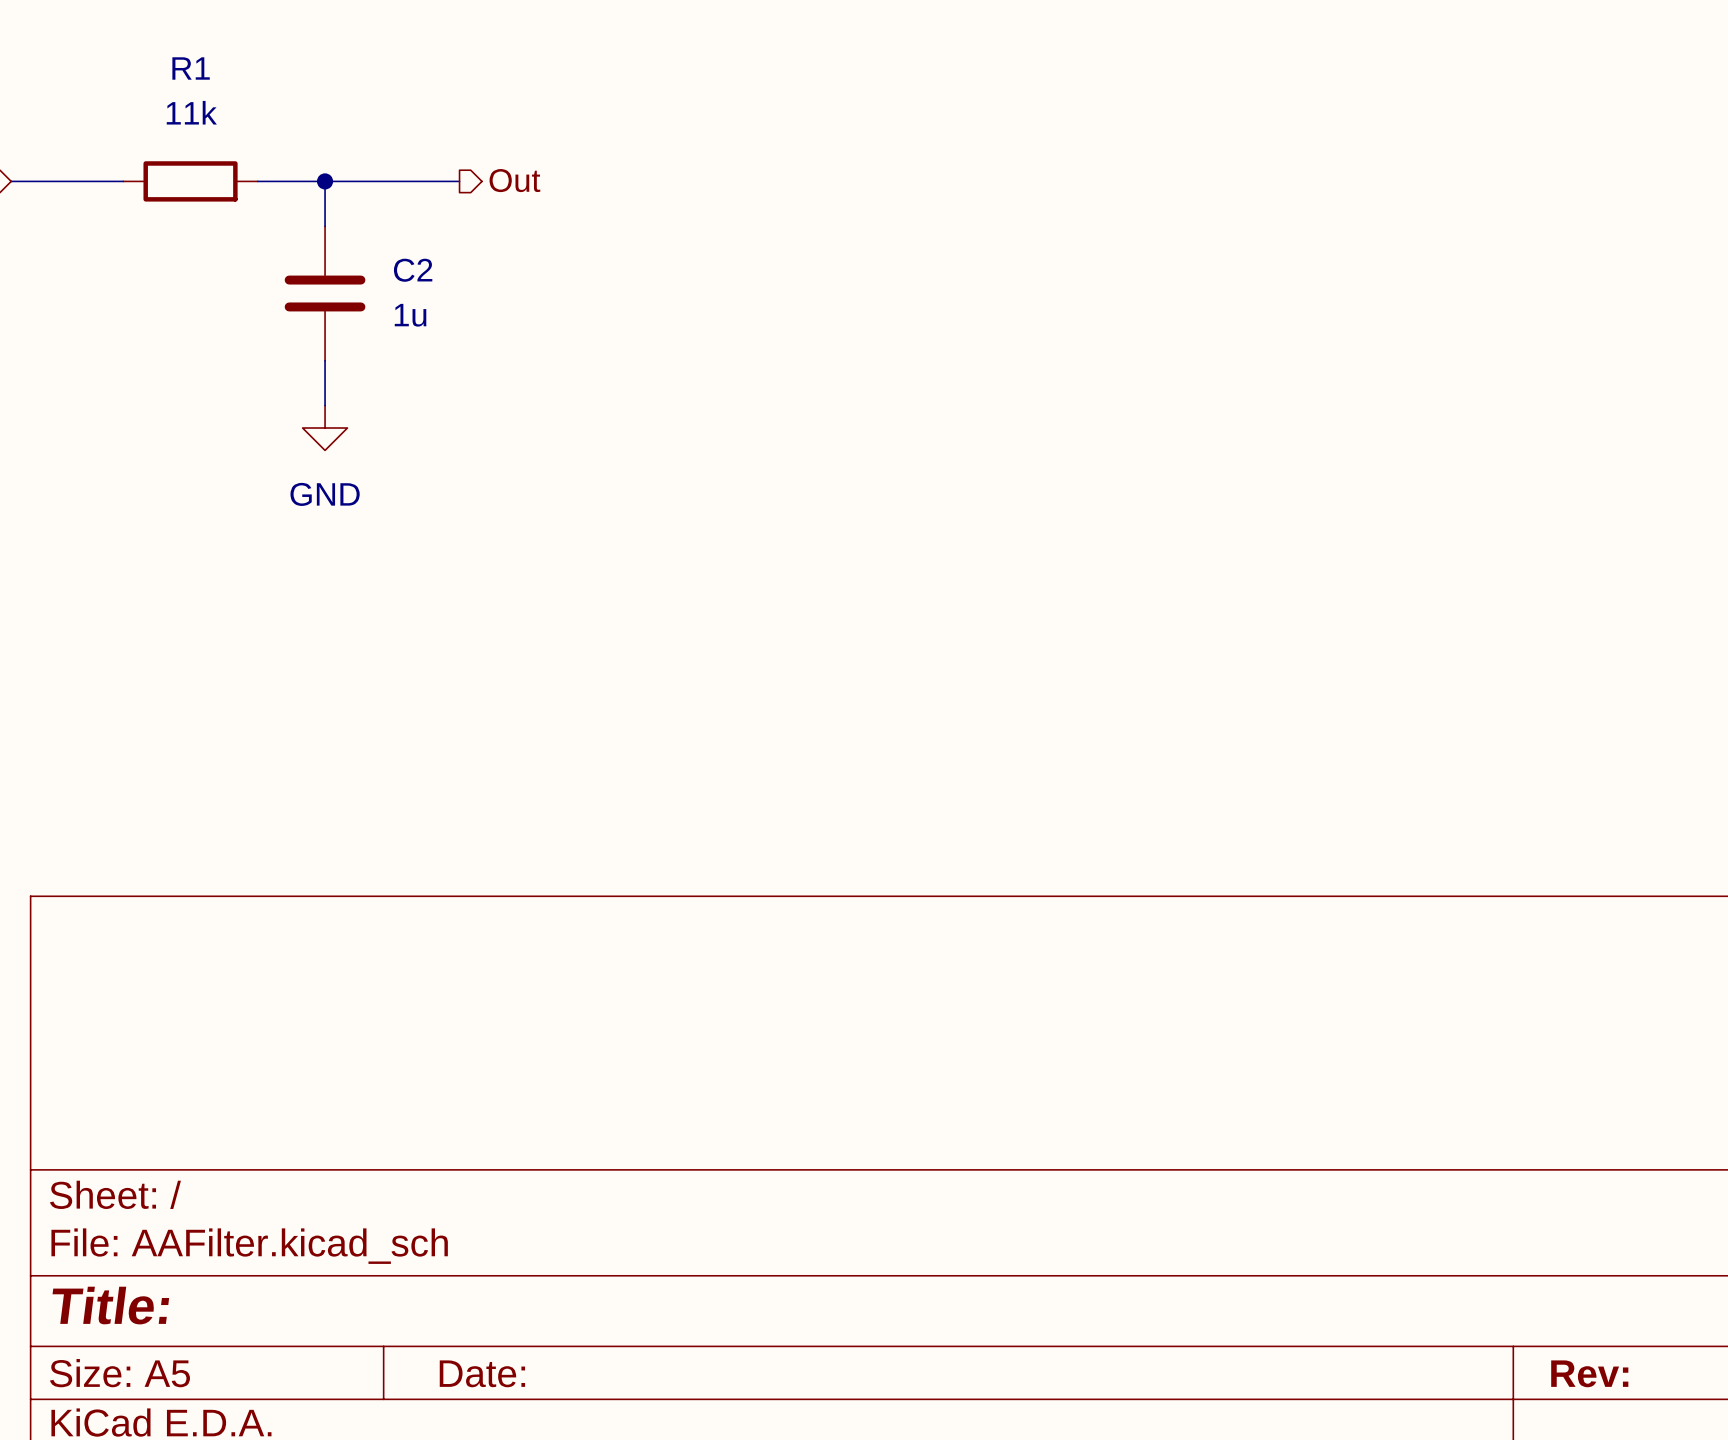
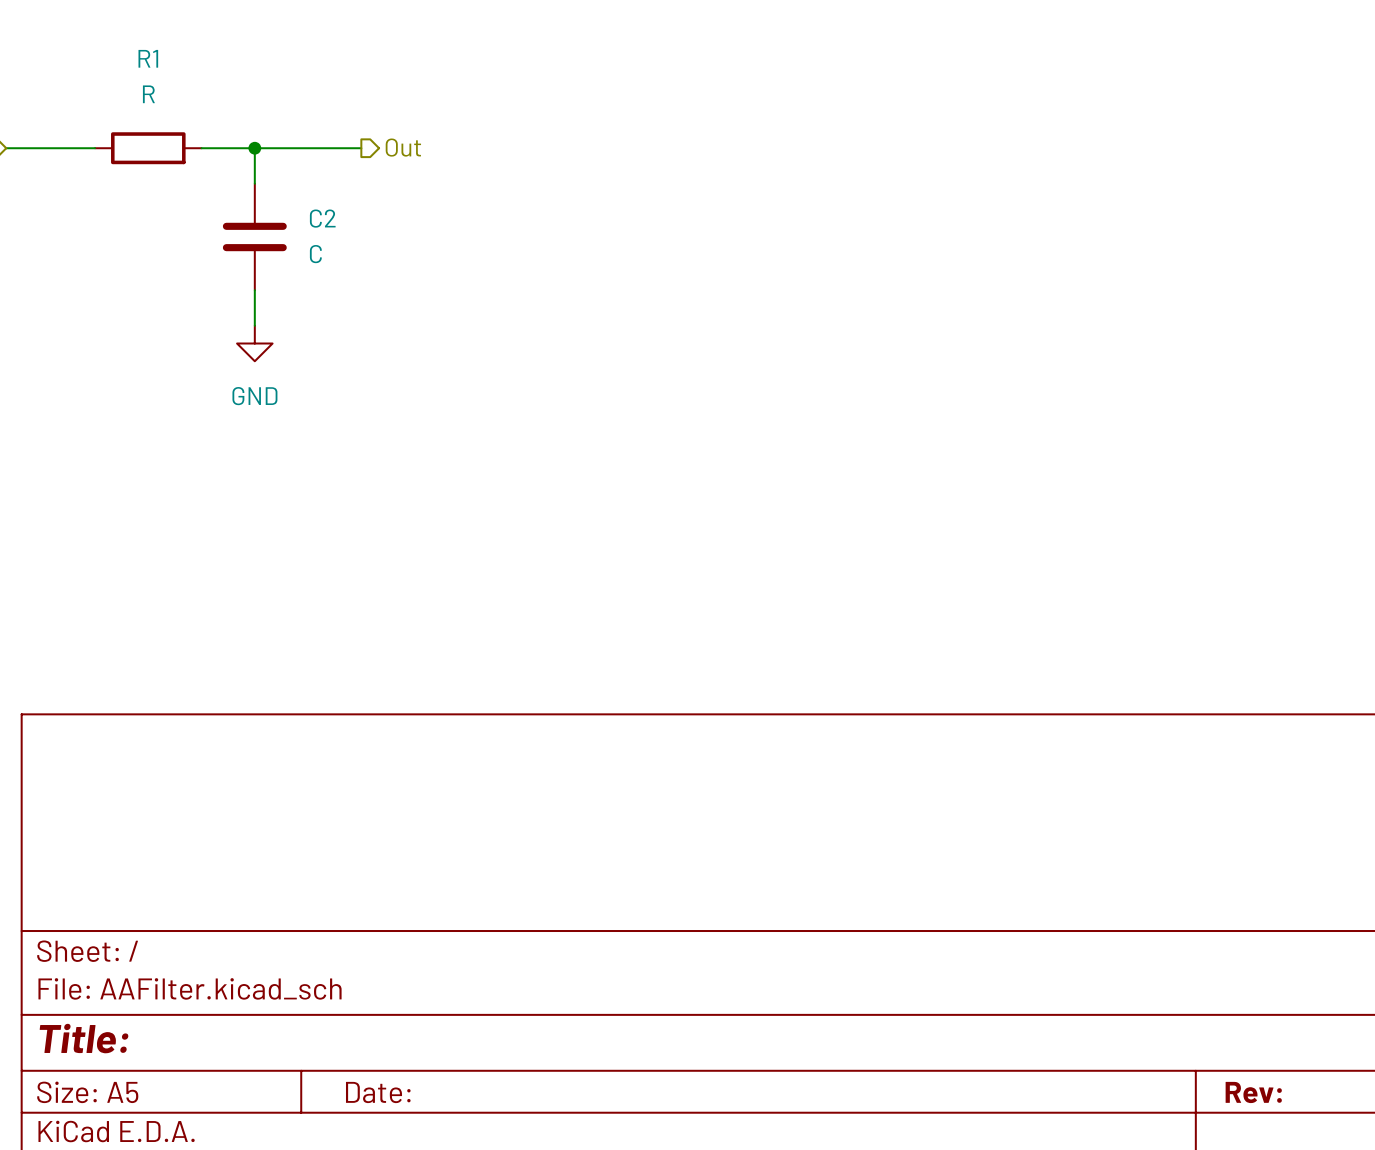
R1 value: 11k (191, 112) -> R (148, 94)
C2 value: 1u (410, 315) -> C (315, 254)

